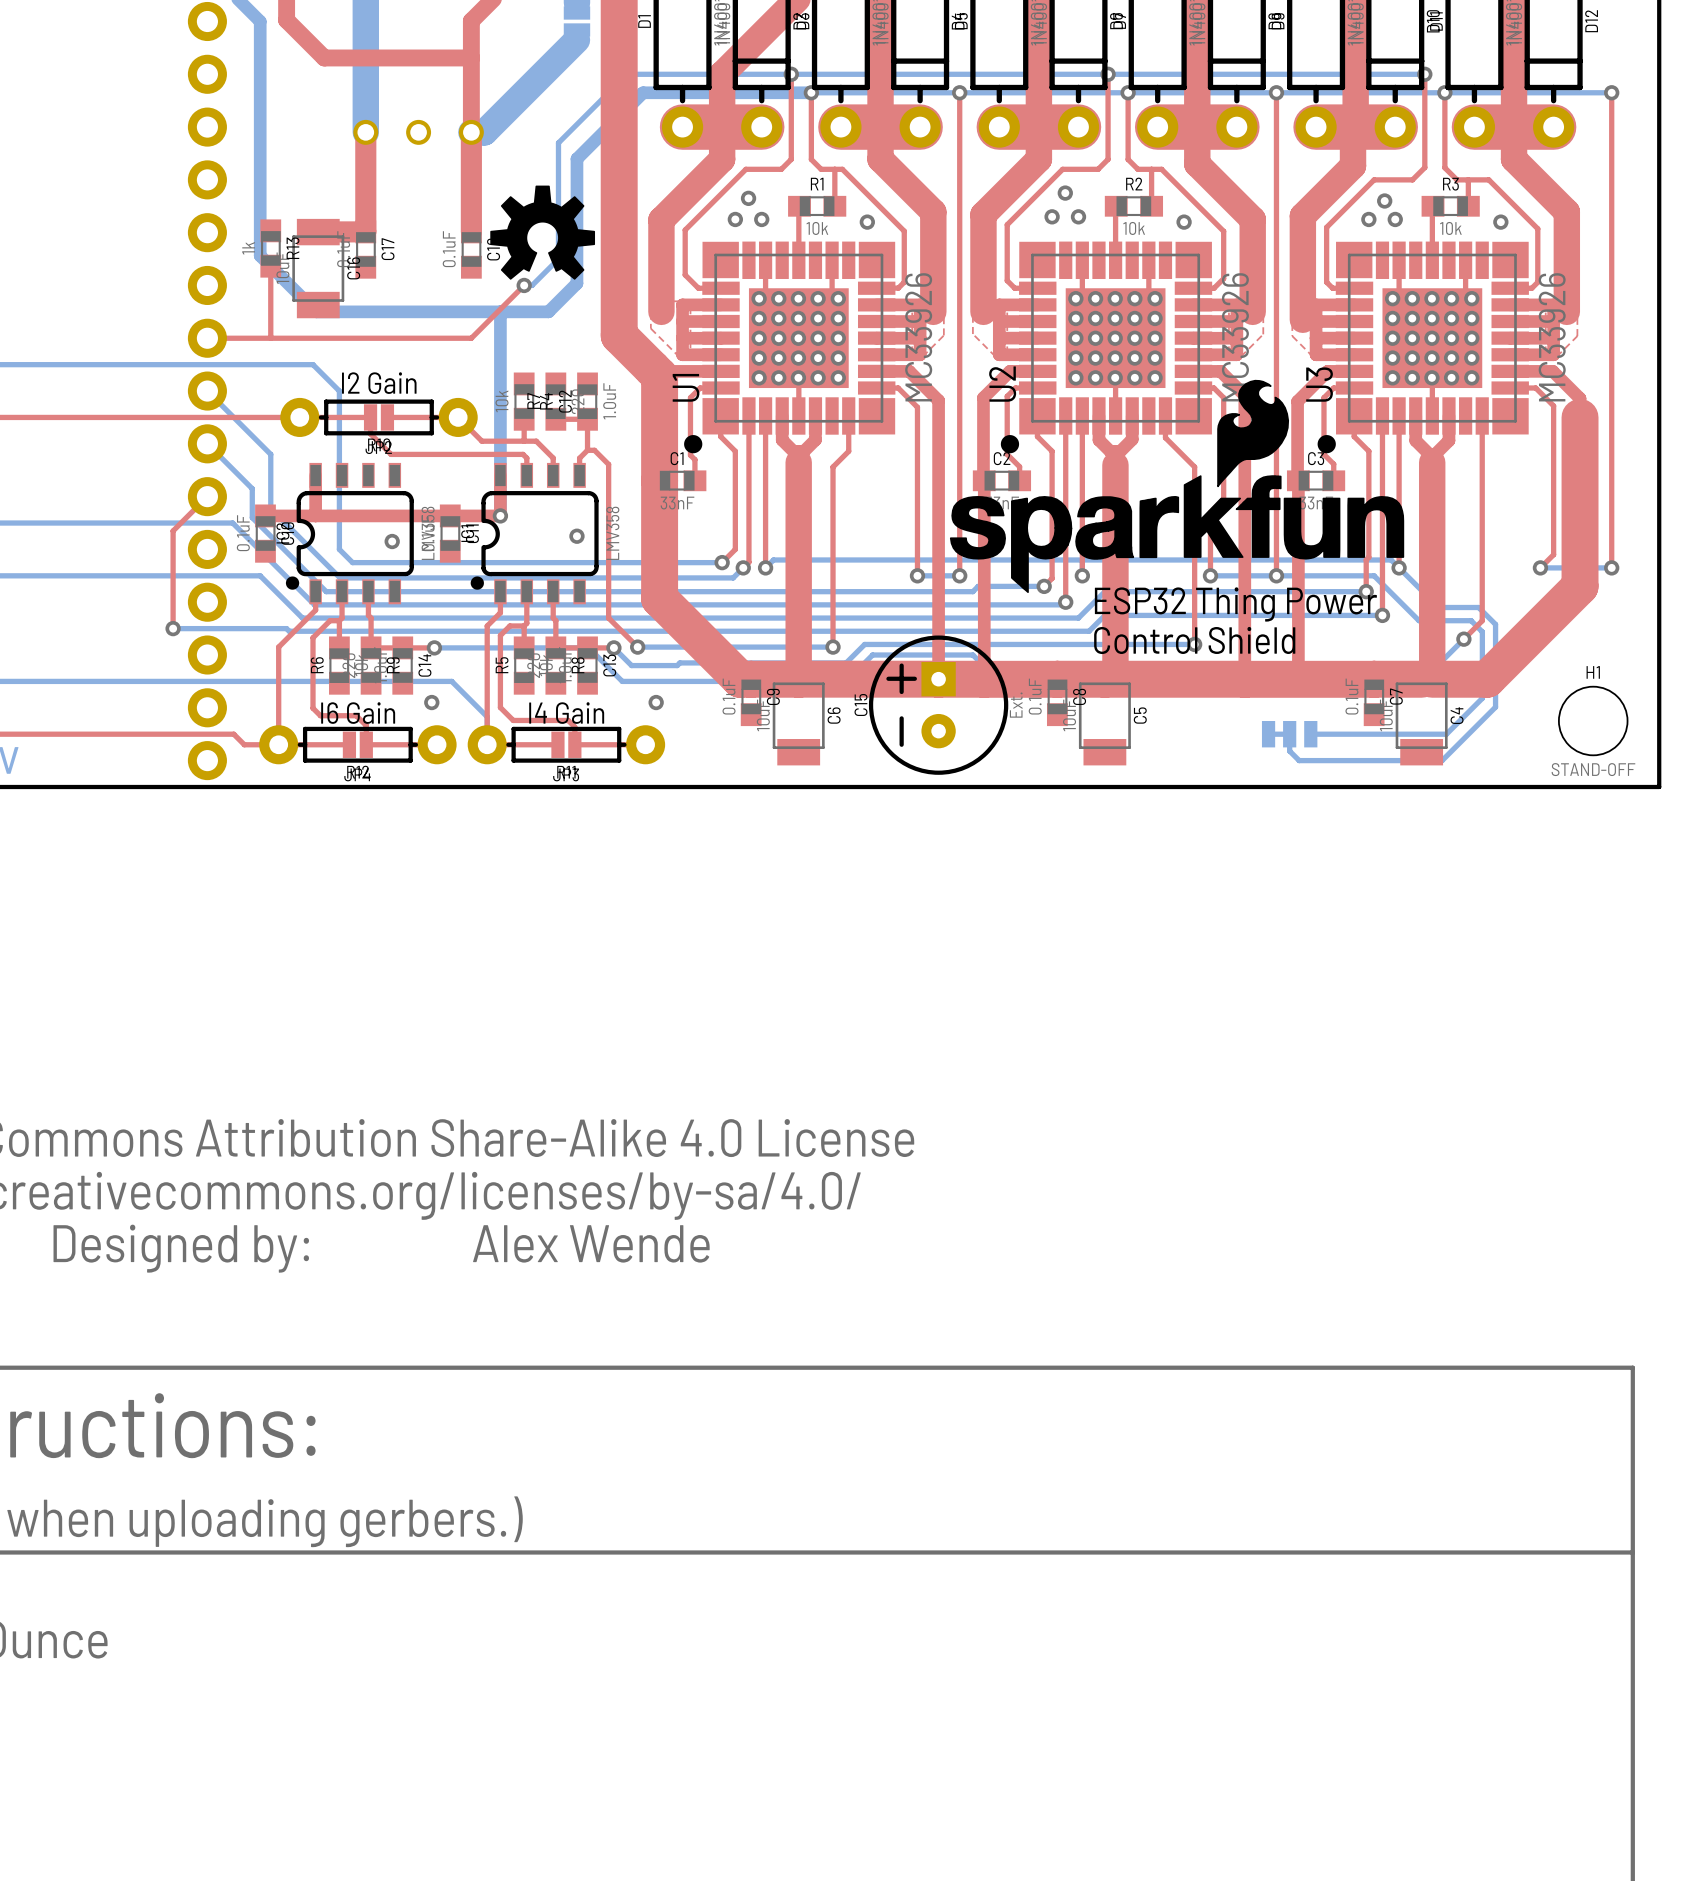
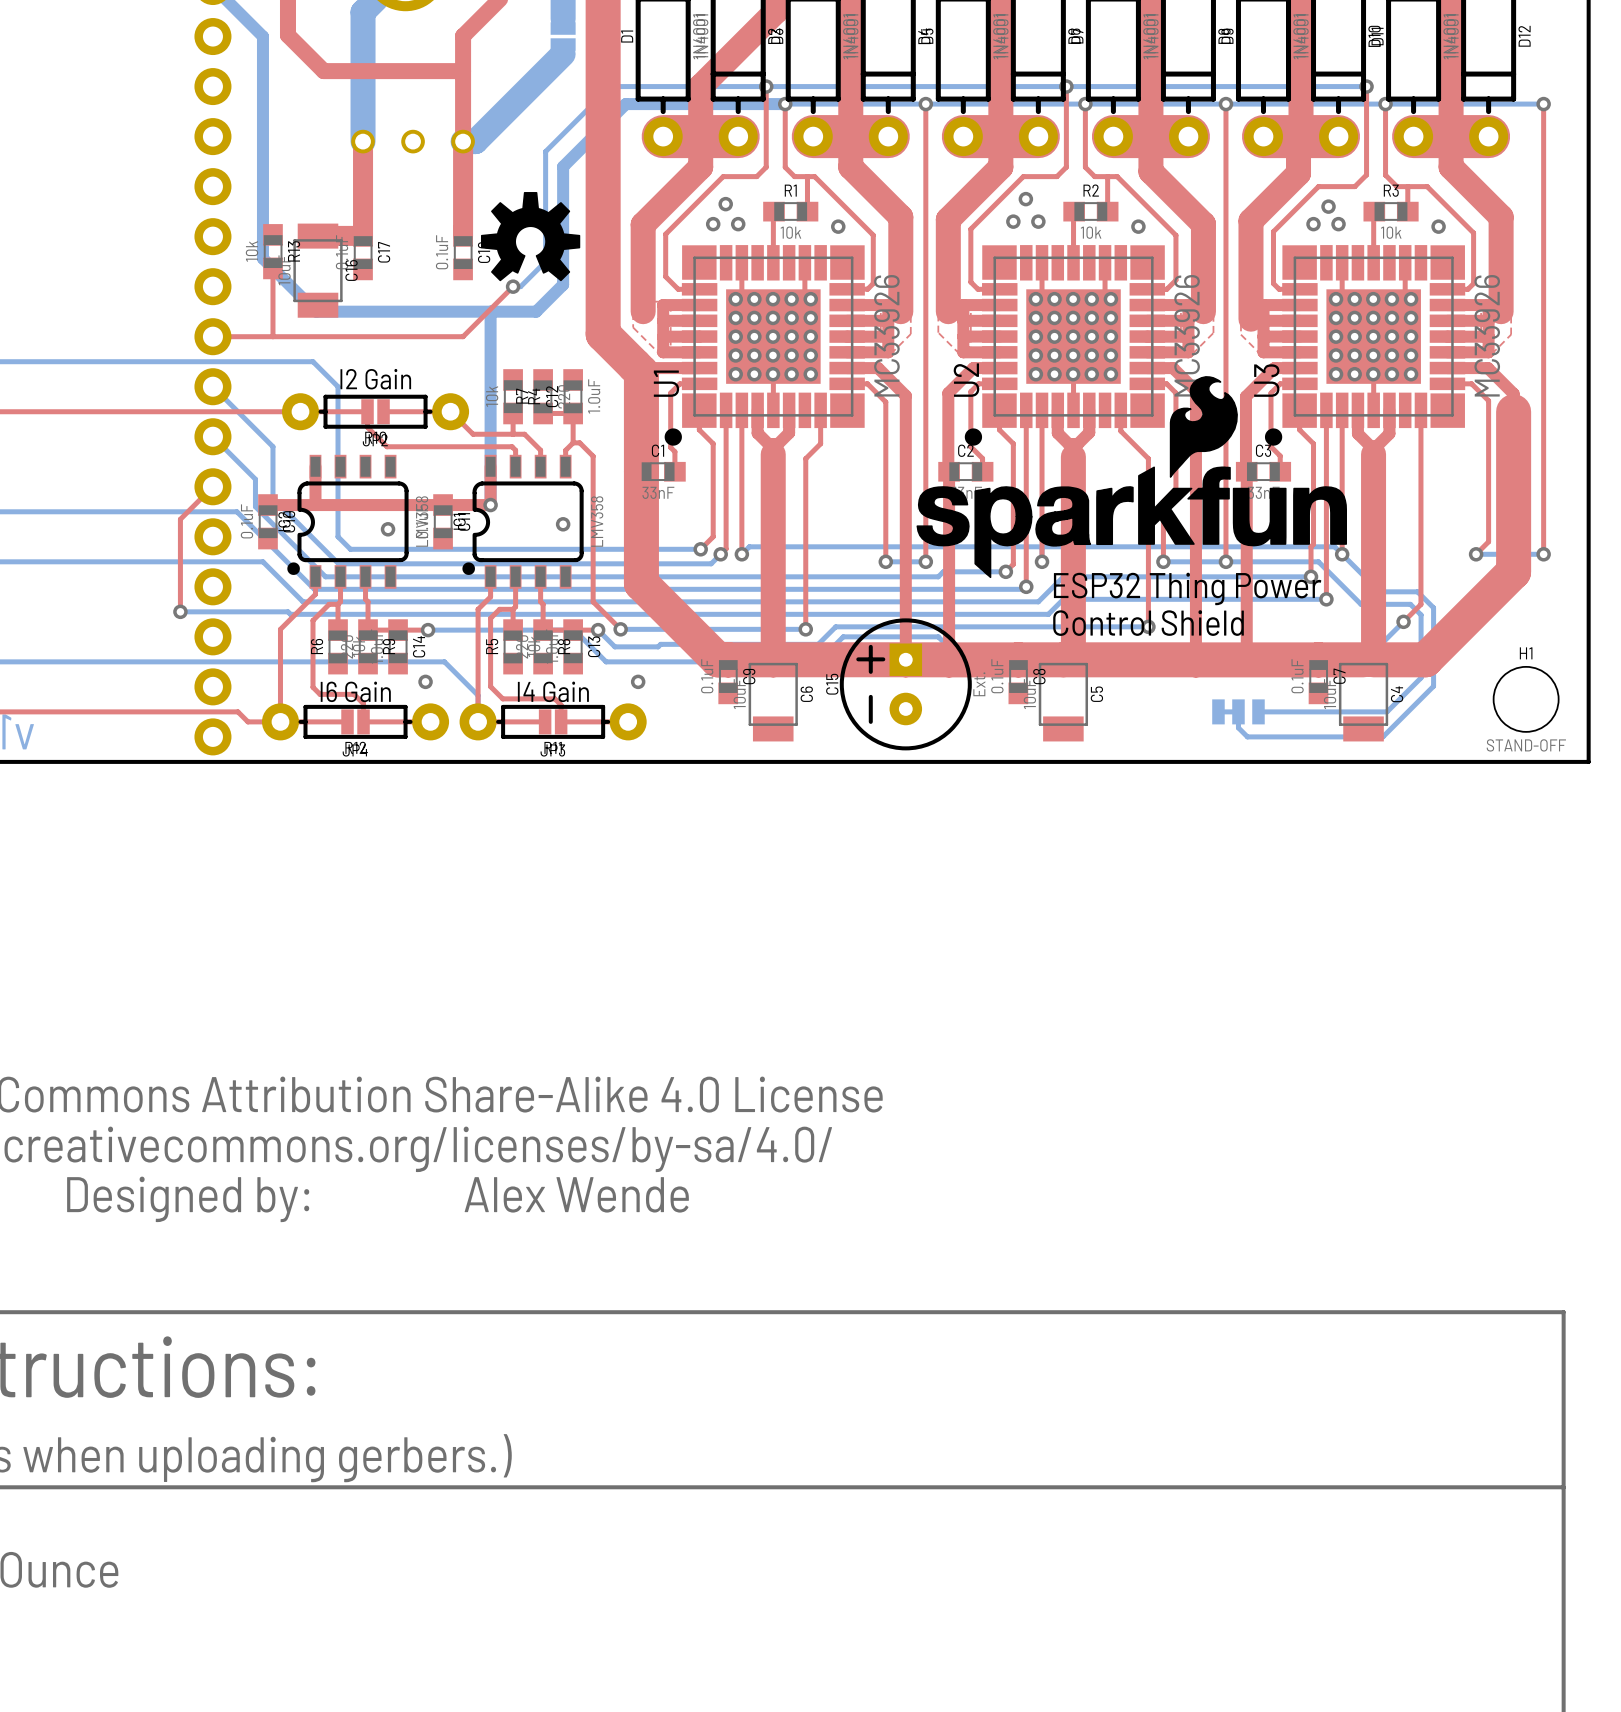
R13 value: 1k (248, 248) -> 10k (251, 251)

